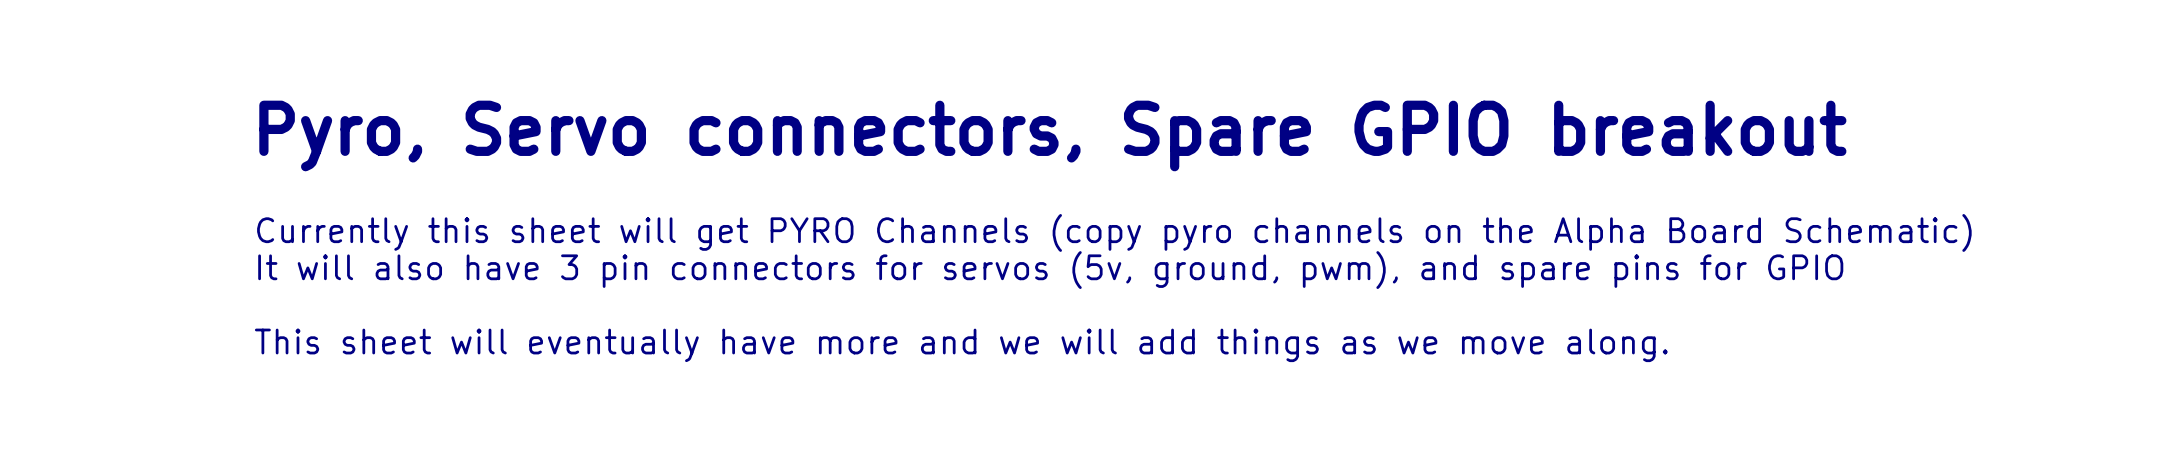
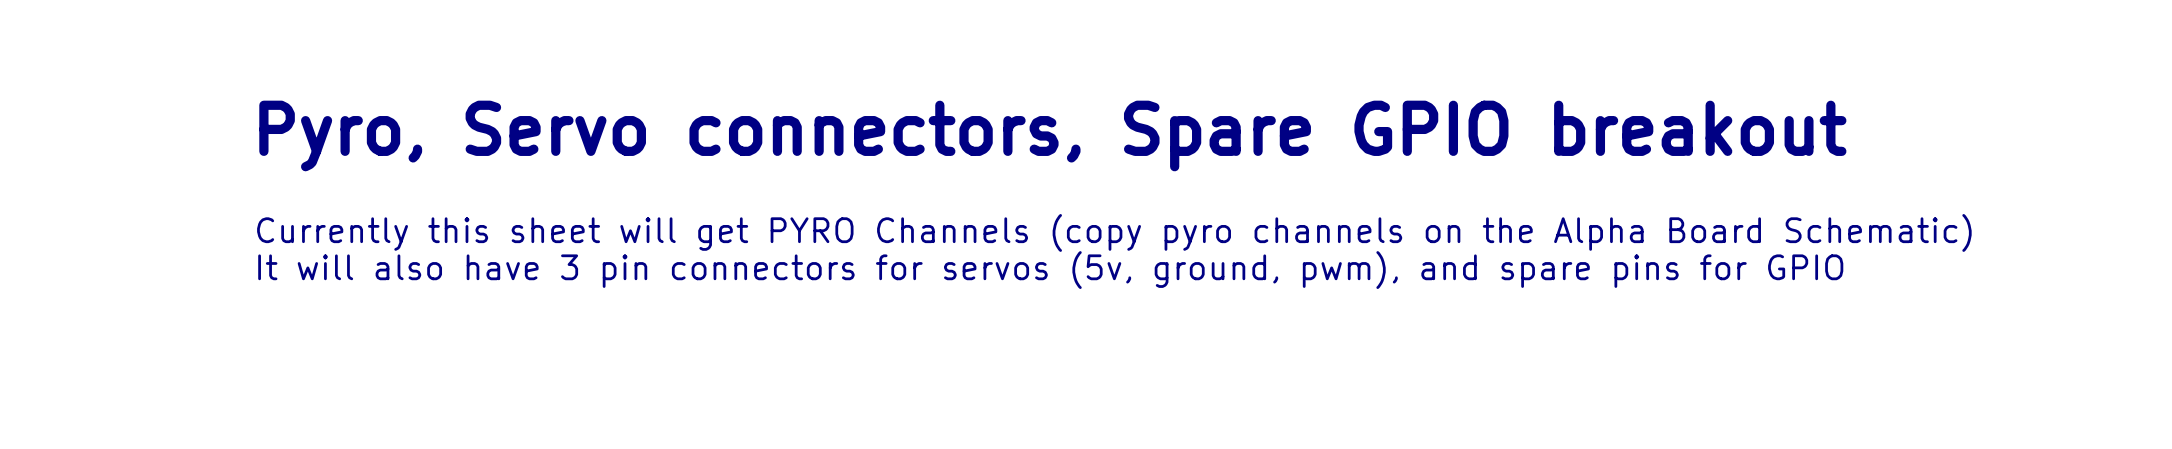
text: This sheet will eventually have more and we will add things as we move along. (961, 345) -> none

